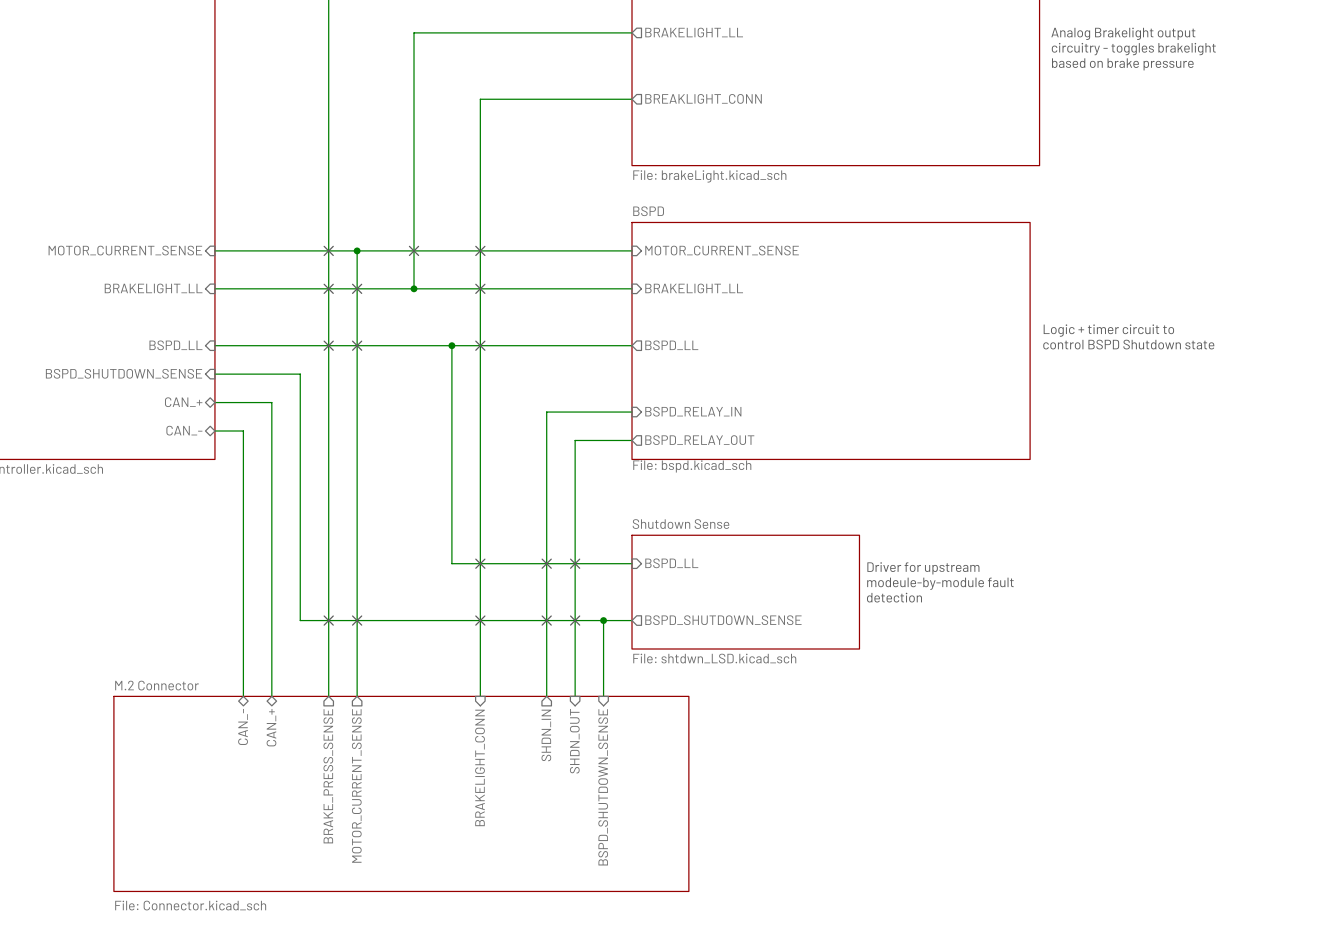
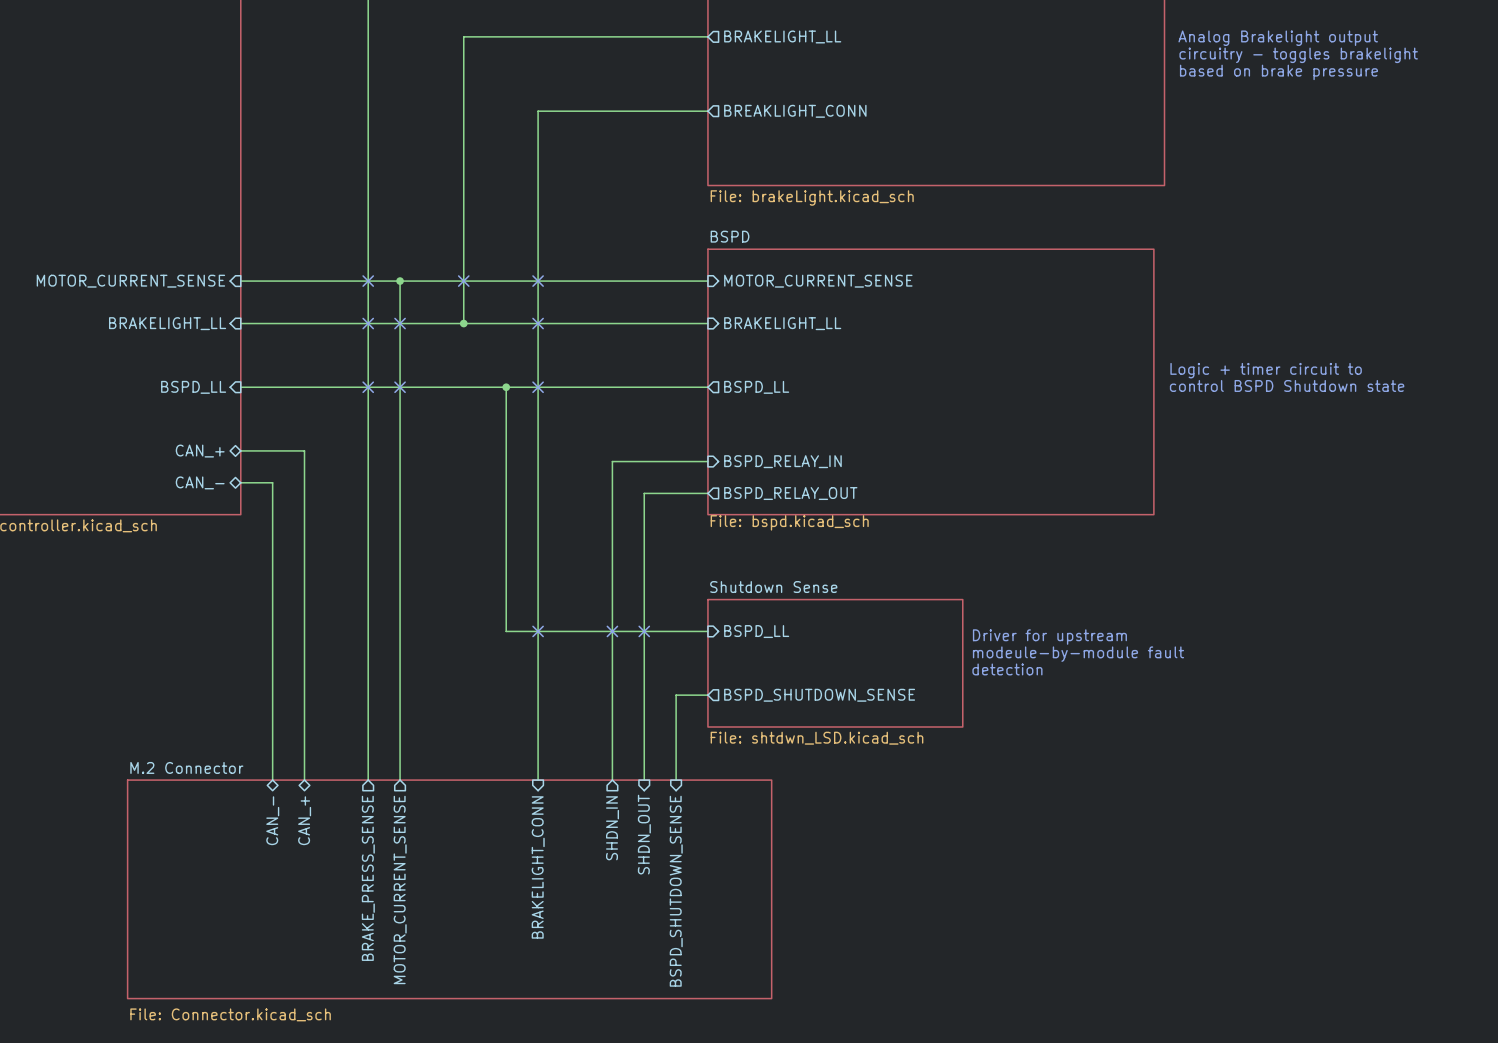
sheet pin: BSPD_SHUTDOWN_SENSE (124, 373) -> none
wire: (214, 374) (300, 374) (300, 620) (603, 620) -> none
no-connect mark: (328, 620) -> none
no-connect mark: (357, 620) -> none
no-connect mark: (480, 620) -> none
no-connect mark: (546, 620) -> none
no-connect mark: (575, 620) -> none
junction: (603, 620) -> none

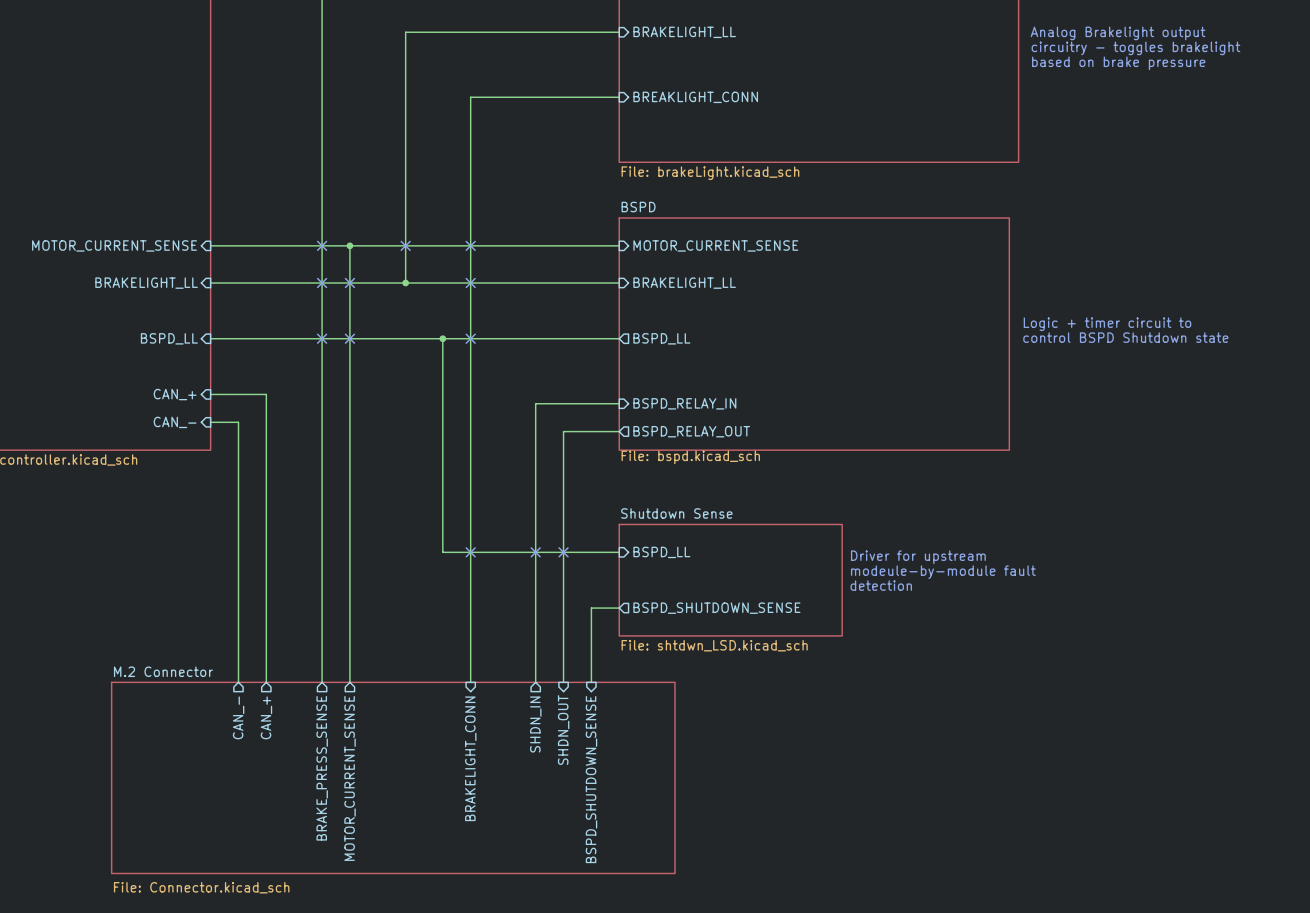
sheet pin shape: output (782, 36) -> input (684, 32)
sheet pin shape: output (795, 111) -> input (695, 97)
sheet pin shape: bidirectional (200, 451) -> input (175, 394)
sheet pin shape: bidirectional (200, 482) -> input (175, 422)
sheet pin shape: bidirectional (272, 820) -> output (238, 717)
sheet pin shape: bidirectional (304, 820) -> output (266, 717)

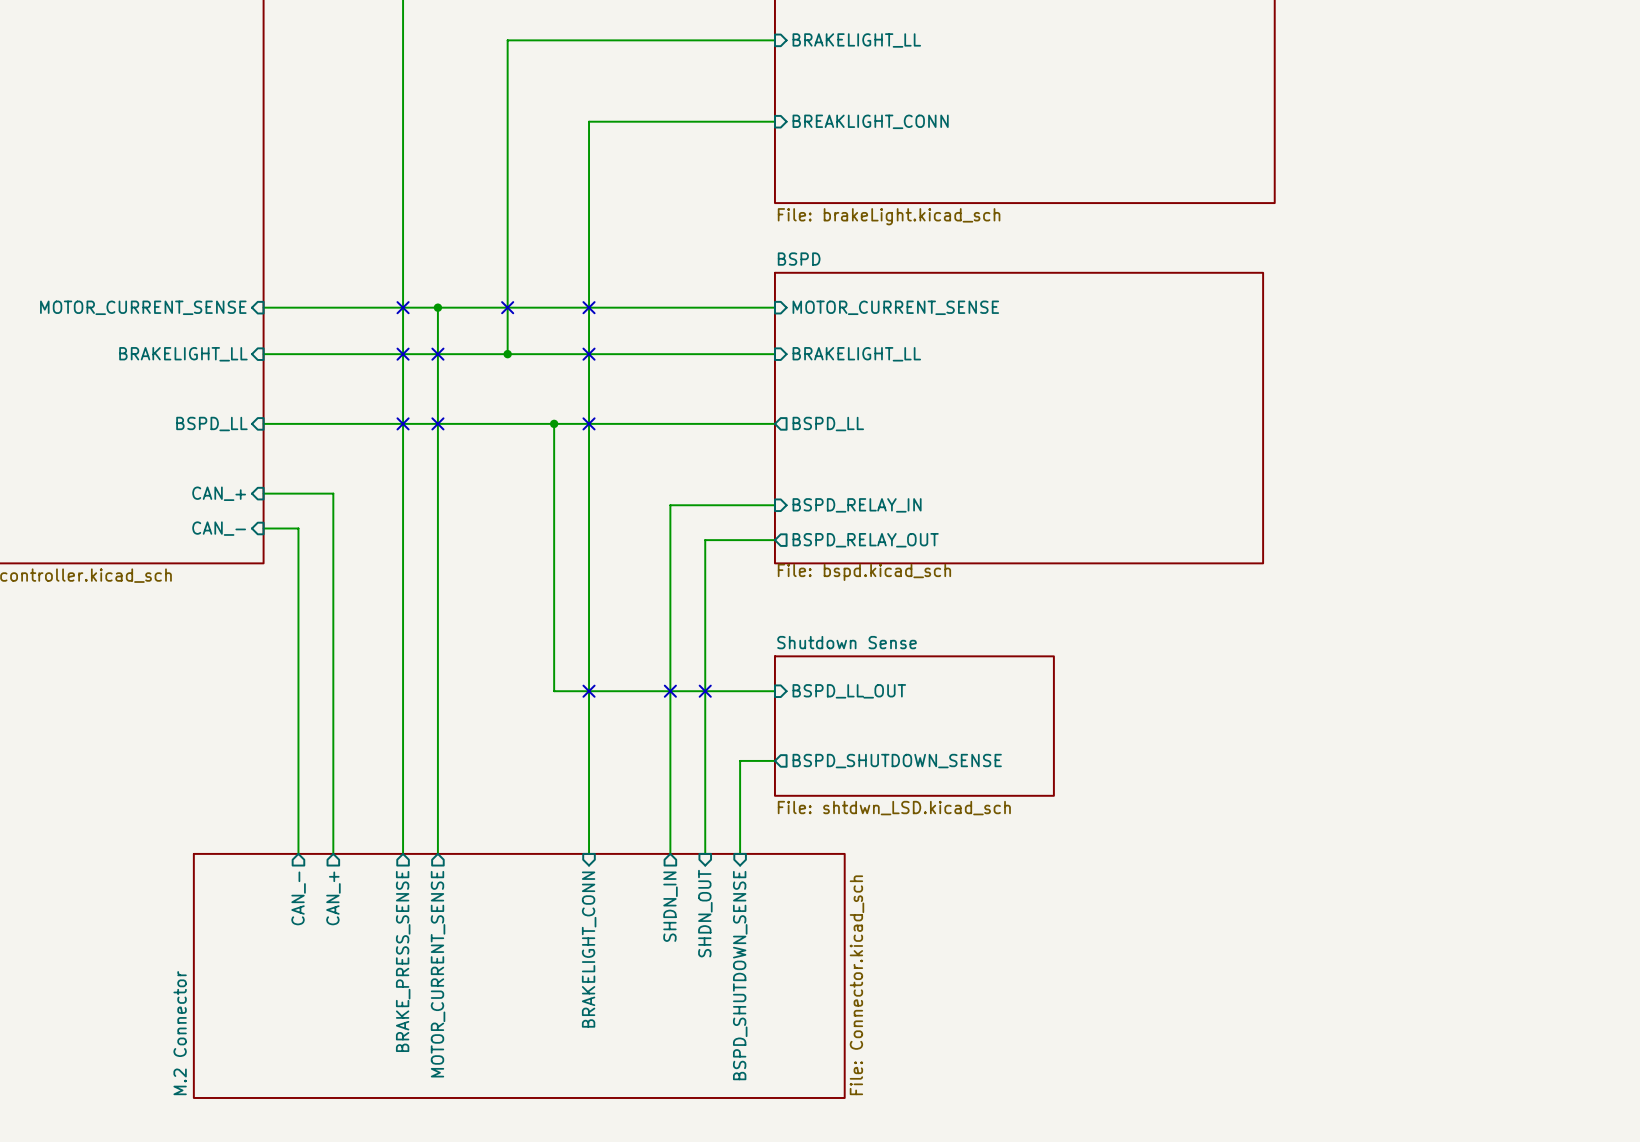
text: Analog Brakelight output (1118, 33) -> none
text: circuitry - toggles brakelight (1135, 48) -> none
text: based on brake pressure (1118, 63) -> none
text: Logic + timer circuit to (1107, 324) -> none
text: control BSPD Shutdown state (1125, 337) -> none
sheet pin: BSPD_LL (661, 552) -> BSPD_LL_OUT (849, 691)
text: Driver for upstream (918, 557) -> none
text: modeule-by-module fault (943, 572) -> none
text: detection (881, 585) -> none
sheet M.2 Connector name position: M.2 Connector (163, 671) -> M.2 Connector (180, 1033)
sheet M.2 Connector shape: [111, 681, 676, 875] -> [193, 853, 846, 1099]
sheet M.2 Connector value position: File: Connector.kicad_sch (201, 887) -> File: Connector.kicad_sch (856, 985)

